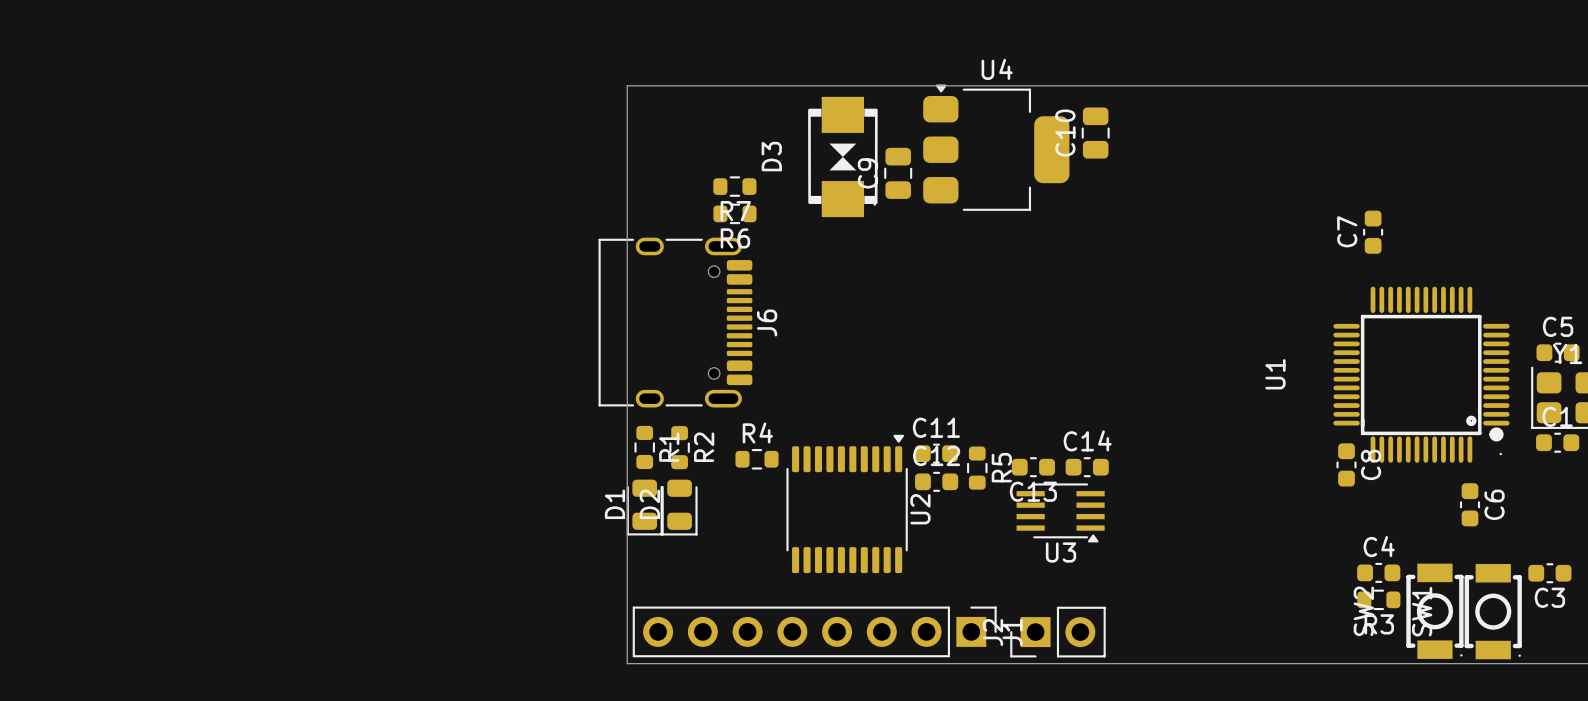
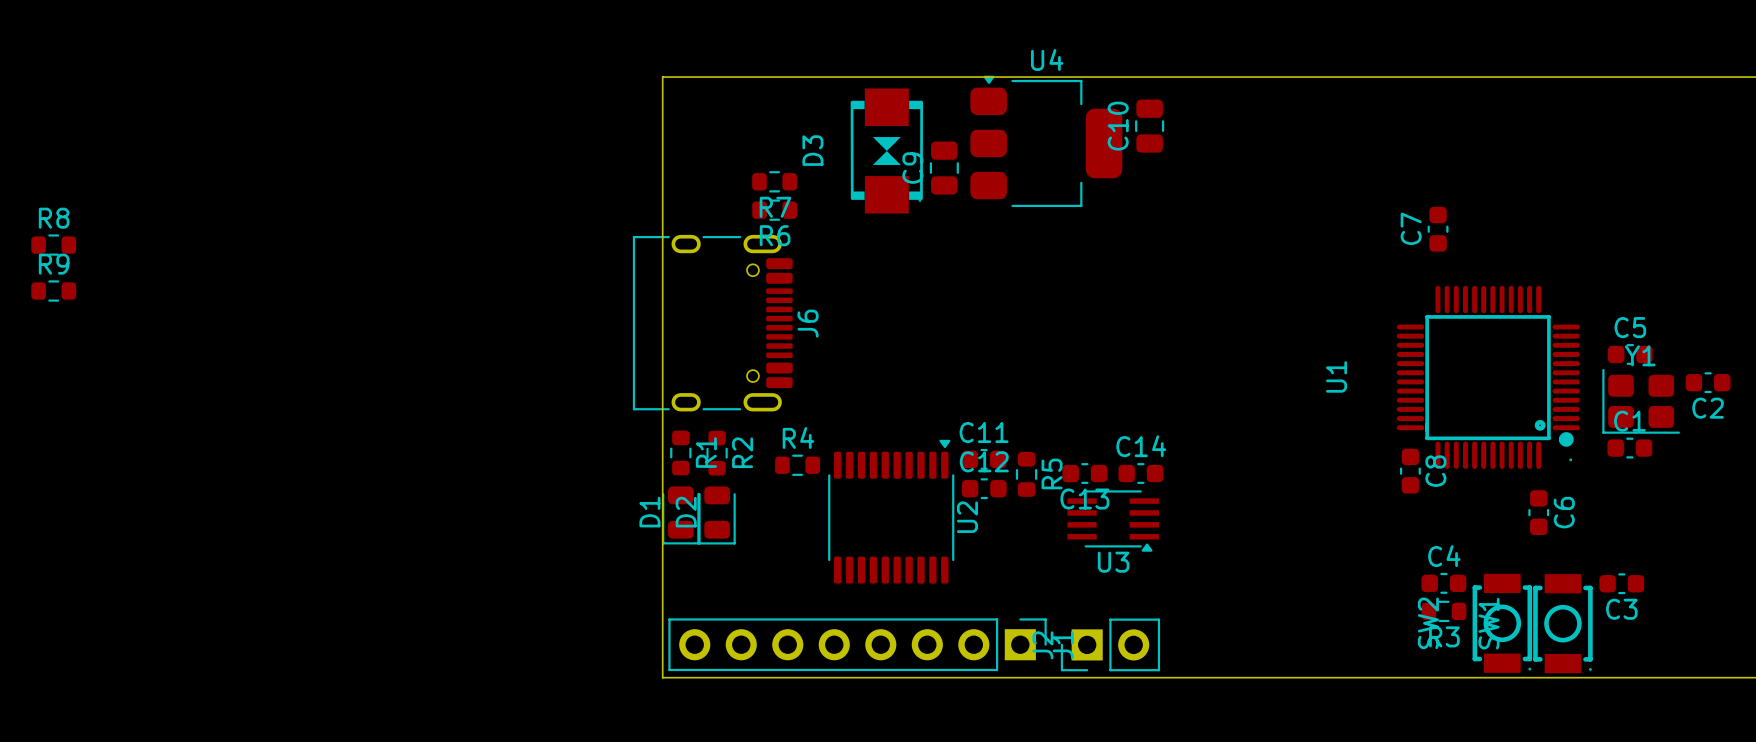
R8: none -> (53, 245)
R9: none -> (53, 291)

